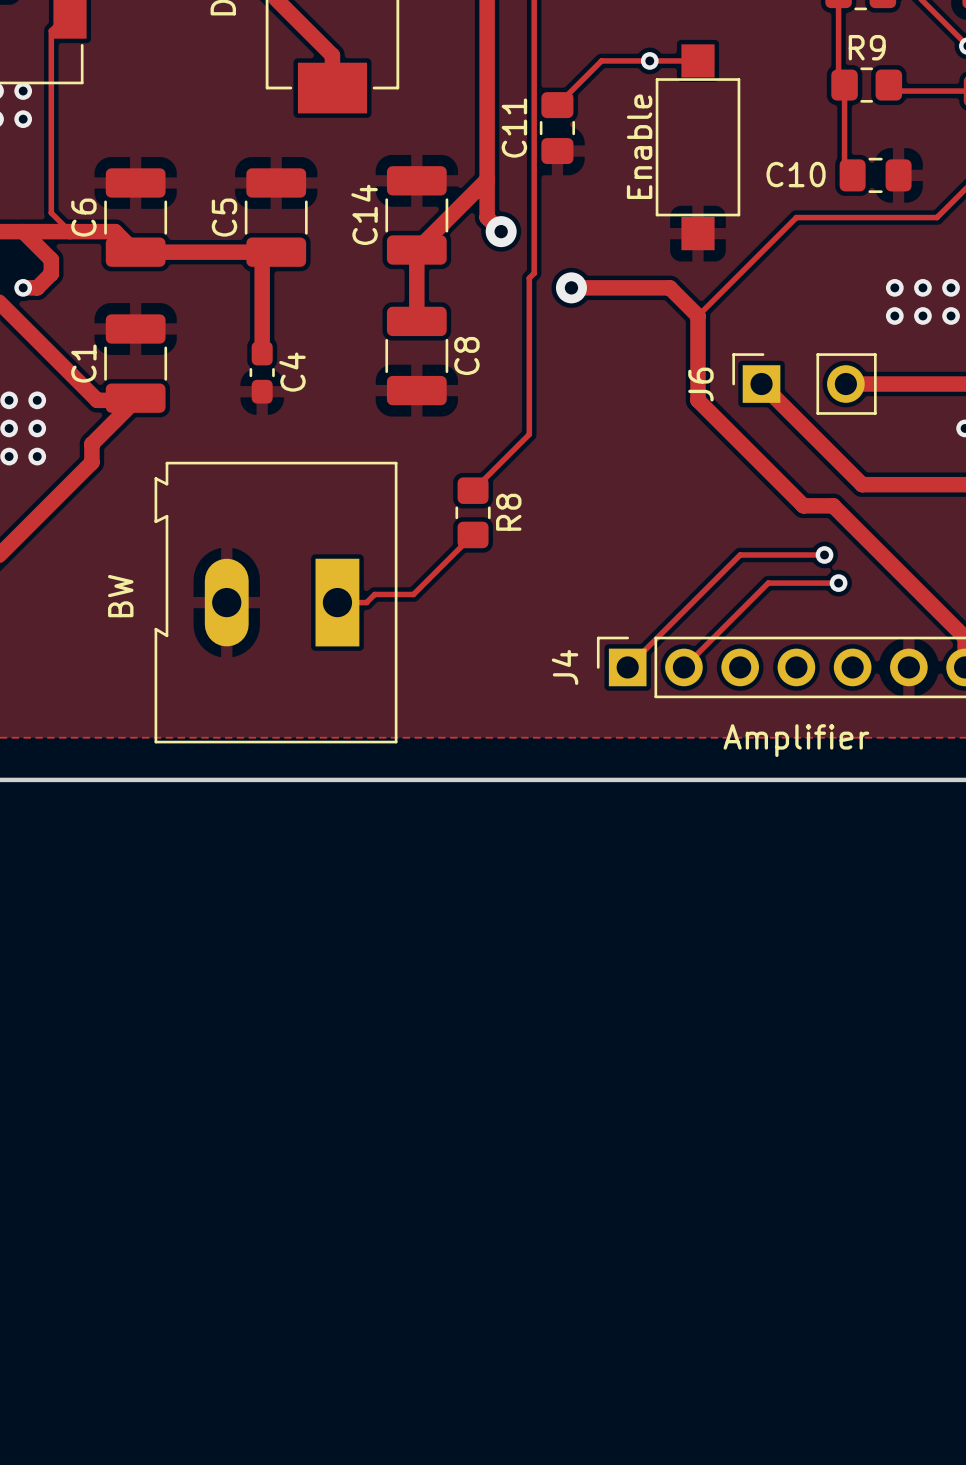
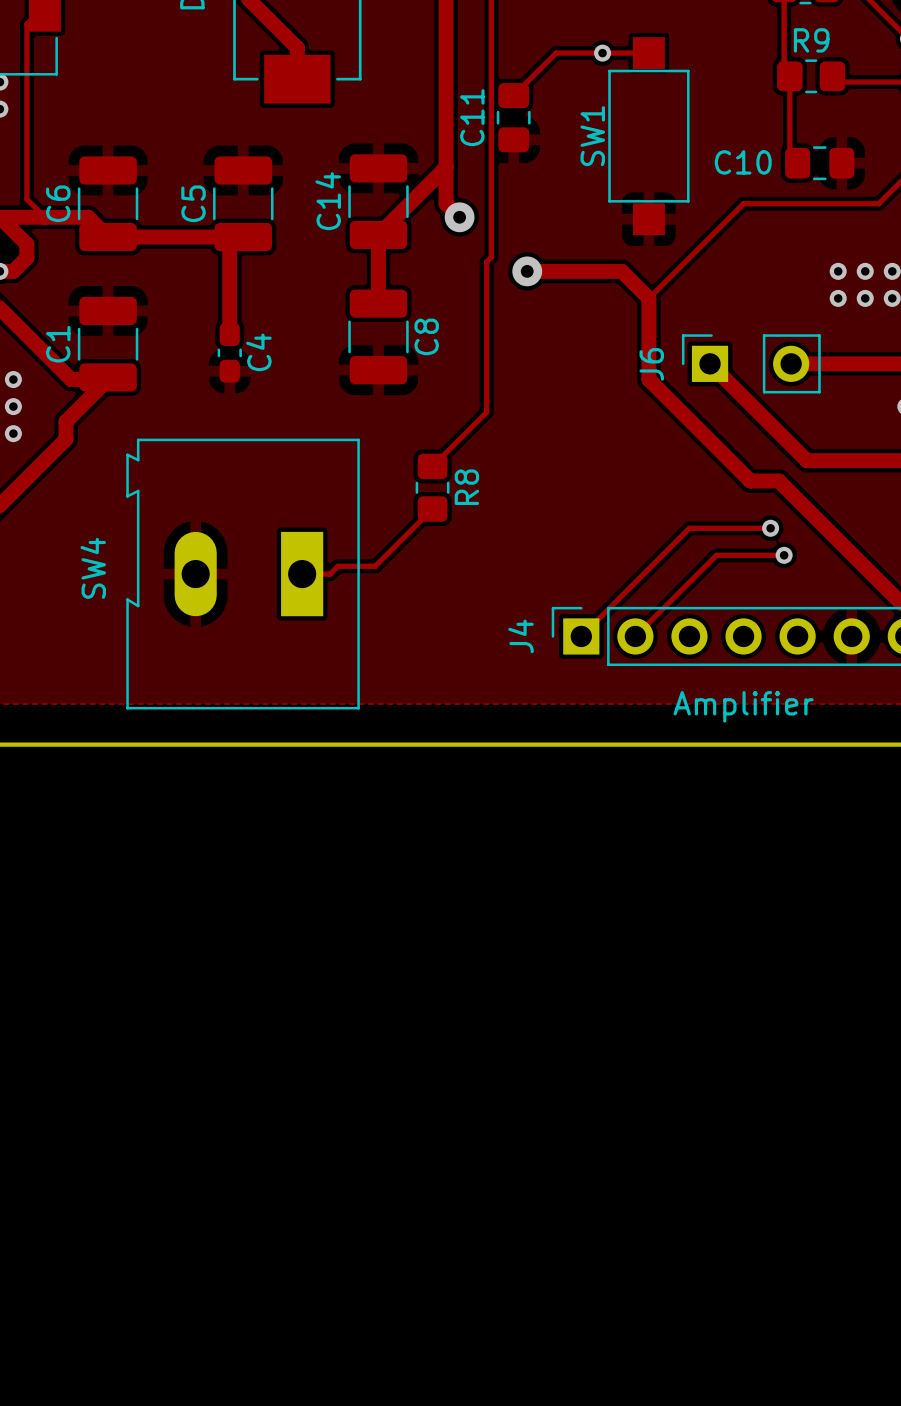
Enable name: Enable (639, 146) -> SW1 (592, 136)
BW name: BW (120, 596) -> SW4 (93, 568)

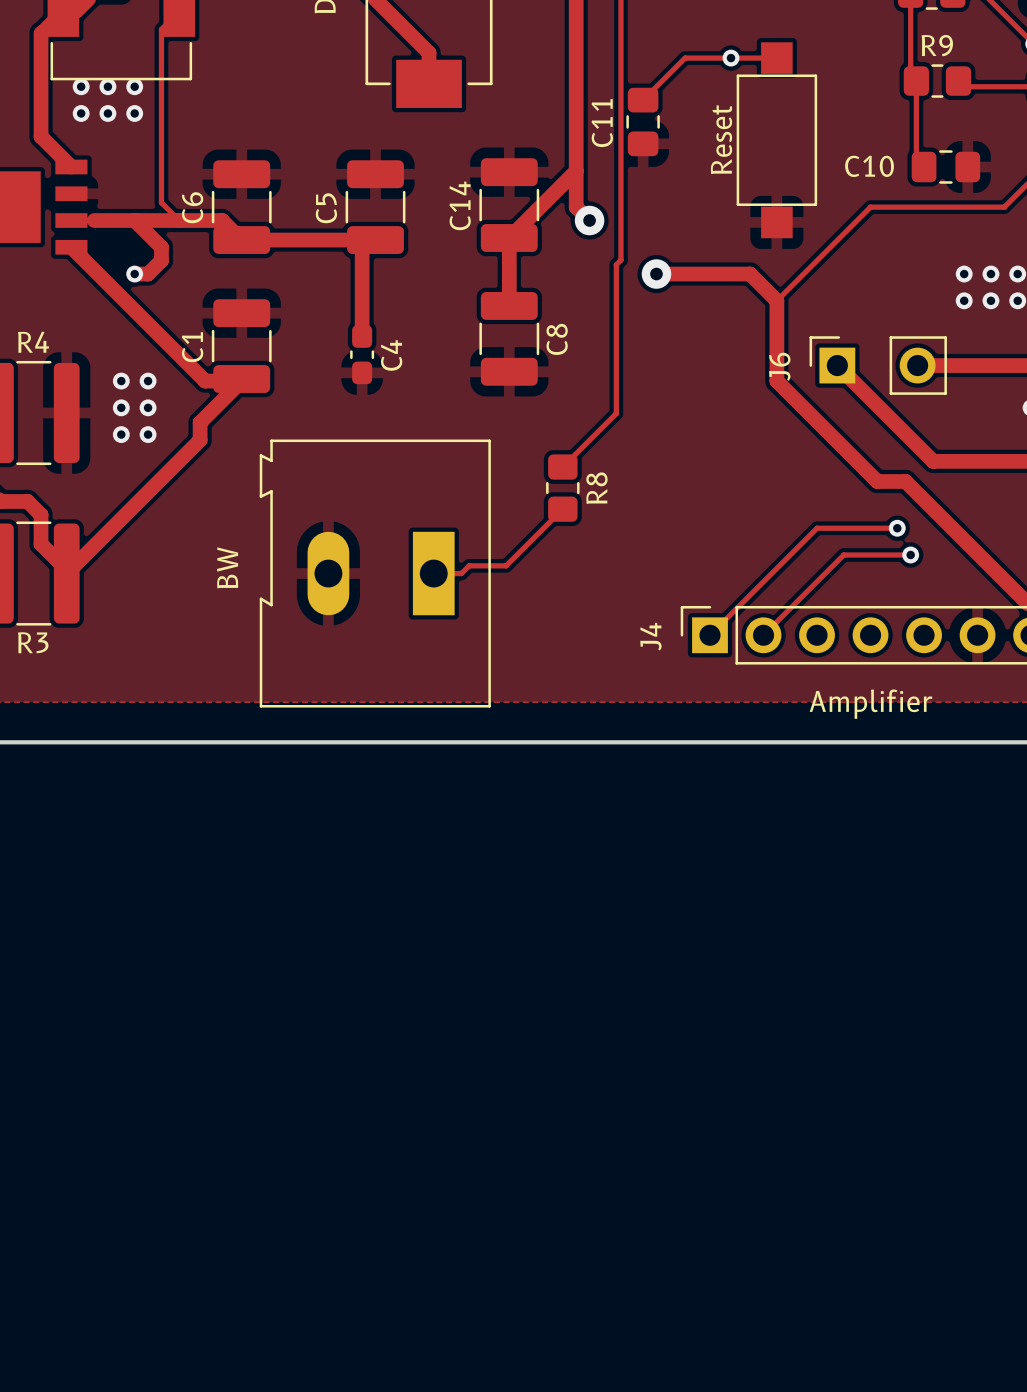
SW1 name: SW1 (592, 136) -> Reset (721, 139)
SW4 name: SW4 (93, 568) -> BW (227, 567)

